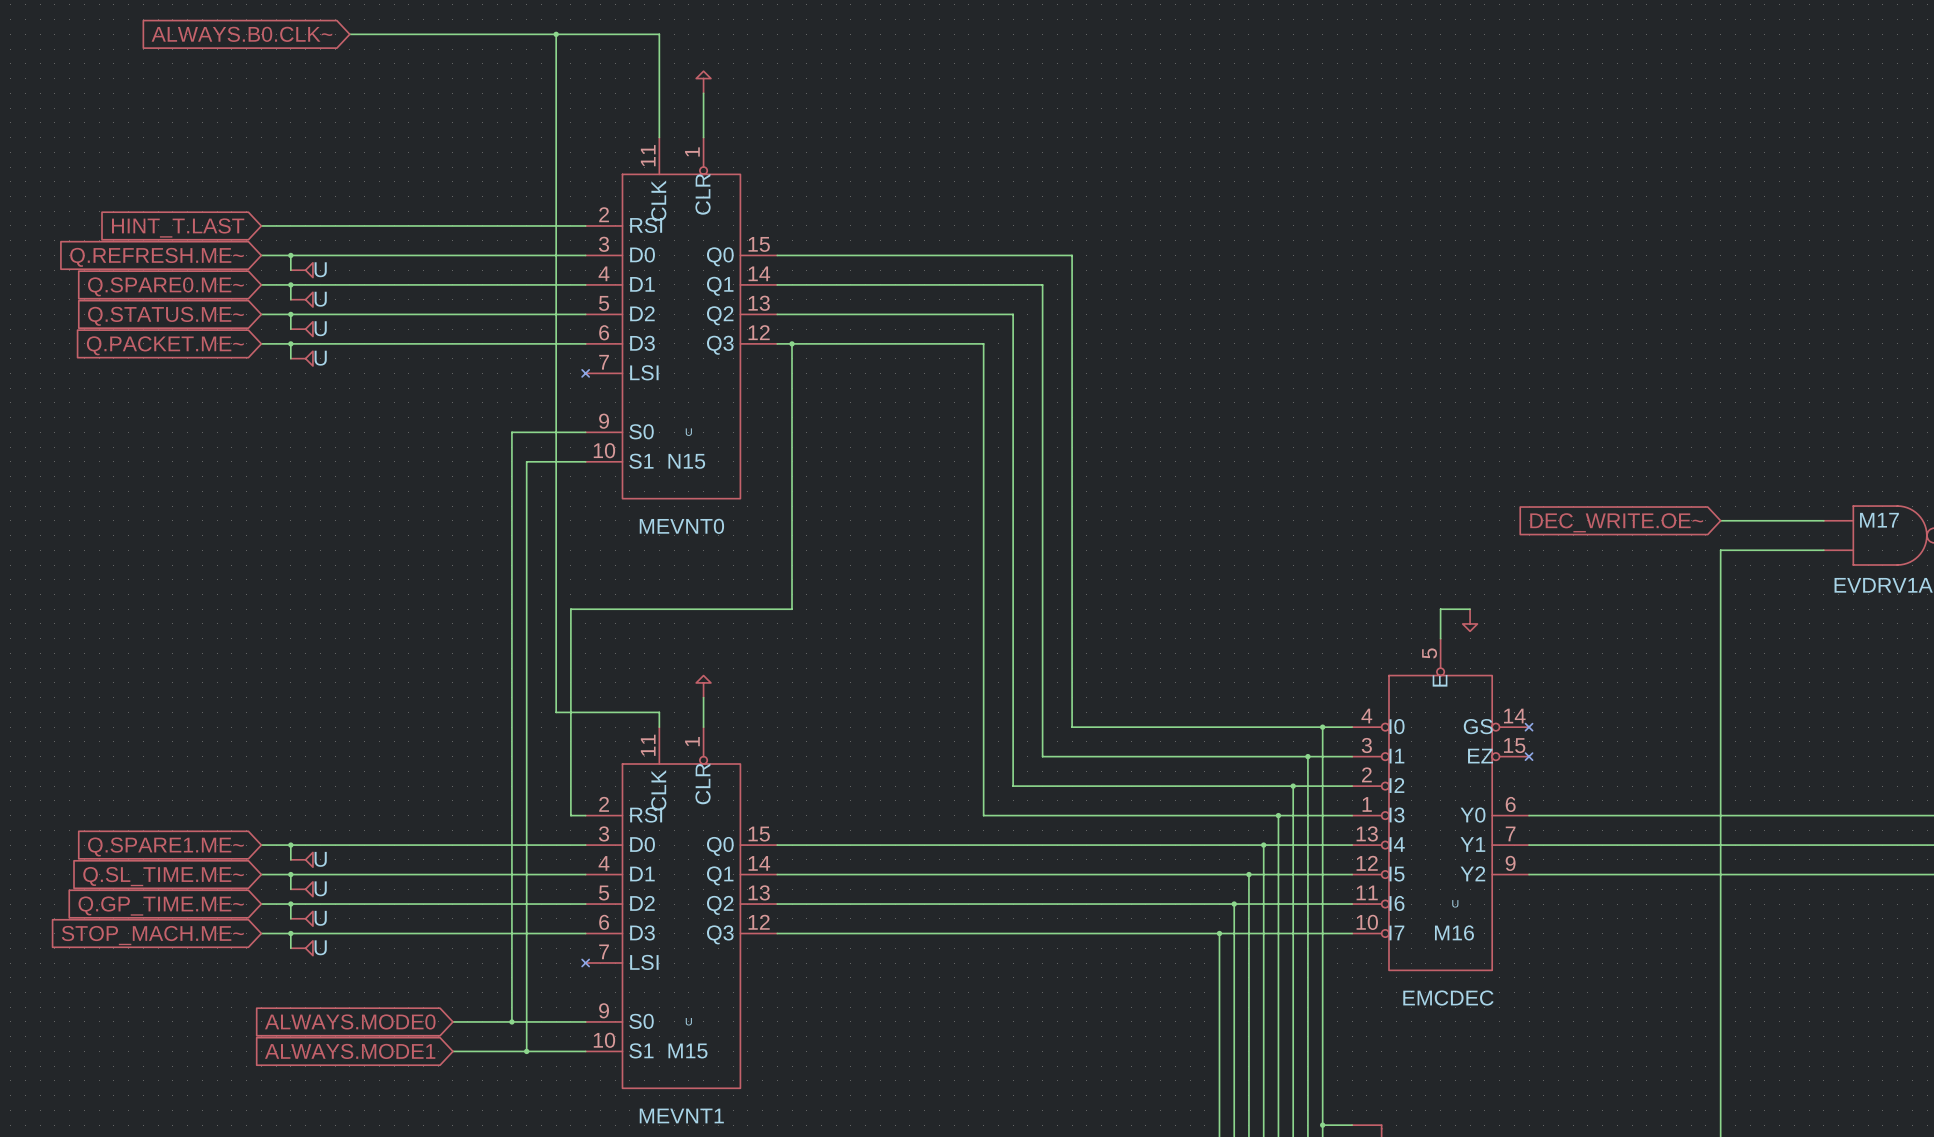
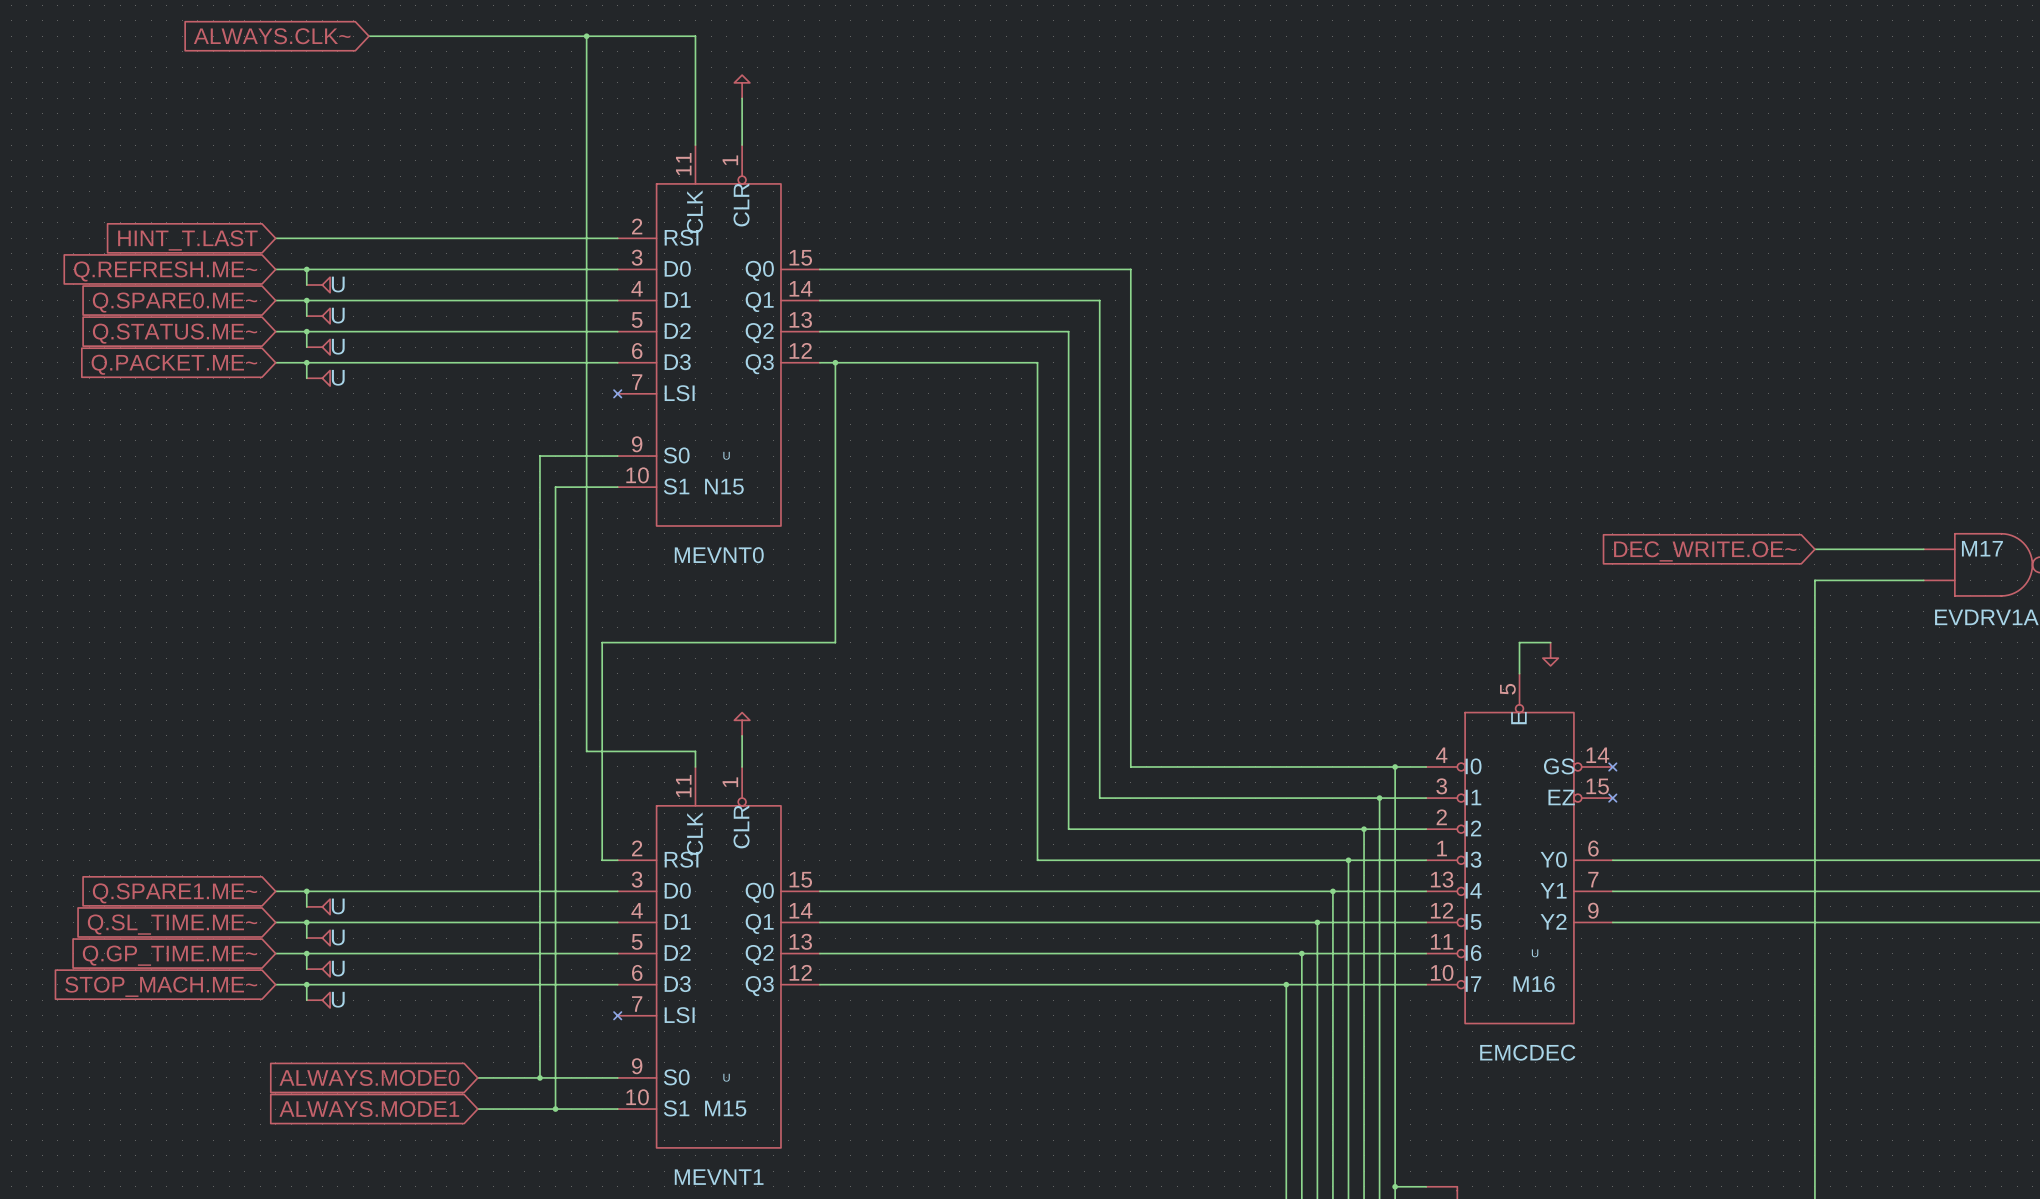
global label: ALWAYS.B0.CLK~ (241, 34) -> ALWAYS.CLK~ (272, 36)

